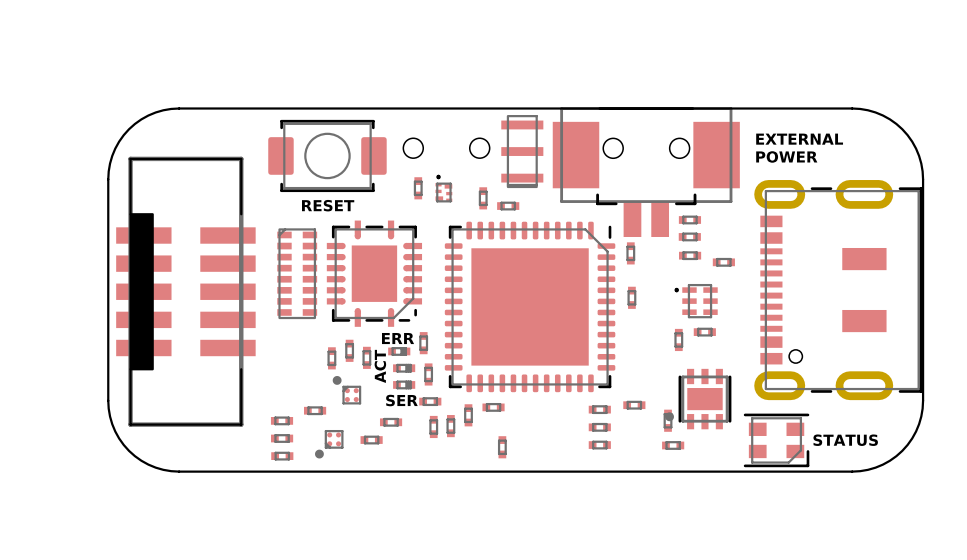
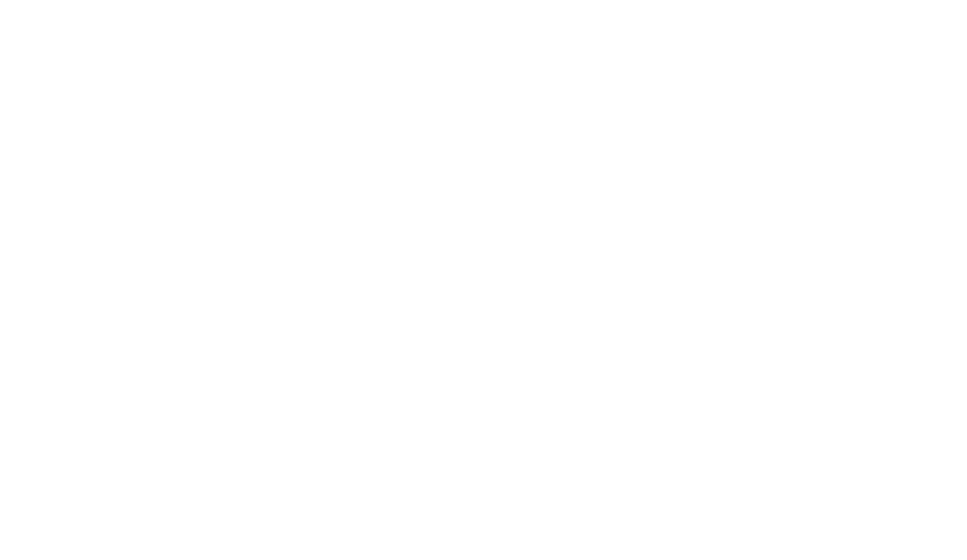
board edge: (179, 108) (852, 108) (867, 110) (882, 115) (896, 123) (912, 141) (919, 155) (922, 171) (923, 400) (921, 416) (916, 431) (902, 450) (889, 460) (875, 467) (852, 471) (179, 471) (163, 469) (148, 464) (129, 450) (119, 438) (112, 424) (108, 408) (108, 171) (112, 155) (119, 141) (134, 123) (155, 112) (179, 108) -> none
text: EXTERNAL (799, 139) -> none
part: (446, 148) -> none
part: (646, 148) -> none
part: (522, 151) -> none
part: (327, 155) -> none
text: POWER (786, 156) -> none
part: (646, 172) -> none
part: (418, 188) -> none
part: (443, 188) -> none
part: (483, 198) -> none
text: RESET (328, 205) -> none
part: (508, 206) -> none
part: (689, 219) -> none
part: (689, 236) -> none
part: (630, 253) -> none
part: (690, 255) -> none
part: (723, 262) -> none
part: (297, 273) -> none
part: (374, 273) -> none
part: (838, 290) -> none
part: (185, 291) -> none
part: (631, 297) -> none
part: (696, 301) -> none
part: (530, 306) -> none
part: (704, 332) -> none
text: ERR (398, 338) -> none
part: (678, 339) -> none
part: (423, 343) -> none
part: (349, 350) -> none
part: (399, 351) -> none
part: (366, 357) -> none
part: (331, 358) -> none
text: ACT (380, 366) -> none
part: (404, 368) -> none
part: (428, 374) -> none
part: (404, 384) -> none
part: (346, 390) -> none
part: (698, 399) -> none
text: SER (401, 400) -> none
part: (430, 401) -> none
part: (634, 405) -> none
part: (493, 407) -> none
part: (599, 409) -> none
part: (315, 410) -> none
part: (468, 415) -> none
part: (282, 420) -> none
part: (668, 420) -> none
part: (391, 422) -> none
part: (433, 426) -> none
part: (450, 426) -> none
part: (599, 427) -> none
part: (282, 438) -> none
part: (371, 440) -> none
part: (776, 440) -> none
text: STATUS (845, 440) -> none
part: (329, 444) -> none
part: (599, 445) -> none
part: (673, 445) -> none
part: (502, 447) -> none
part: (282, 456) -> none

